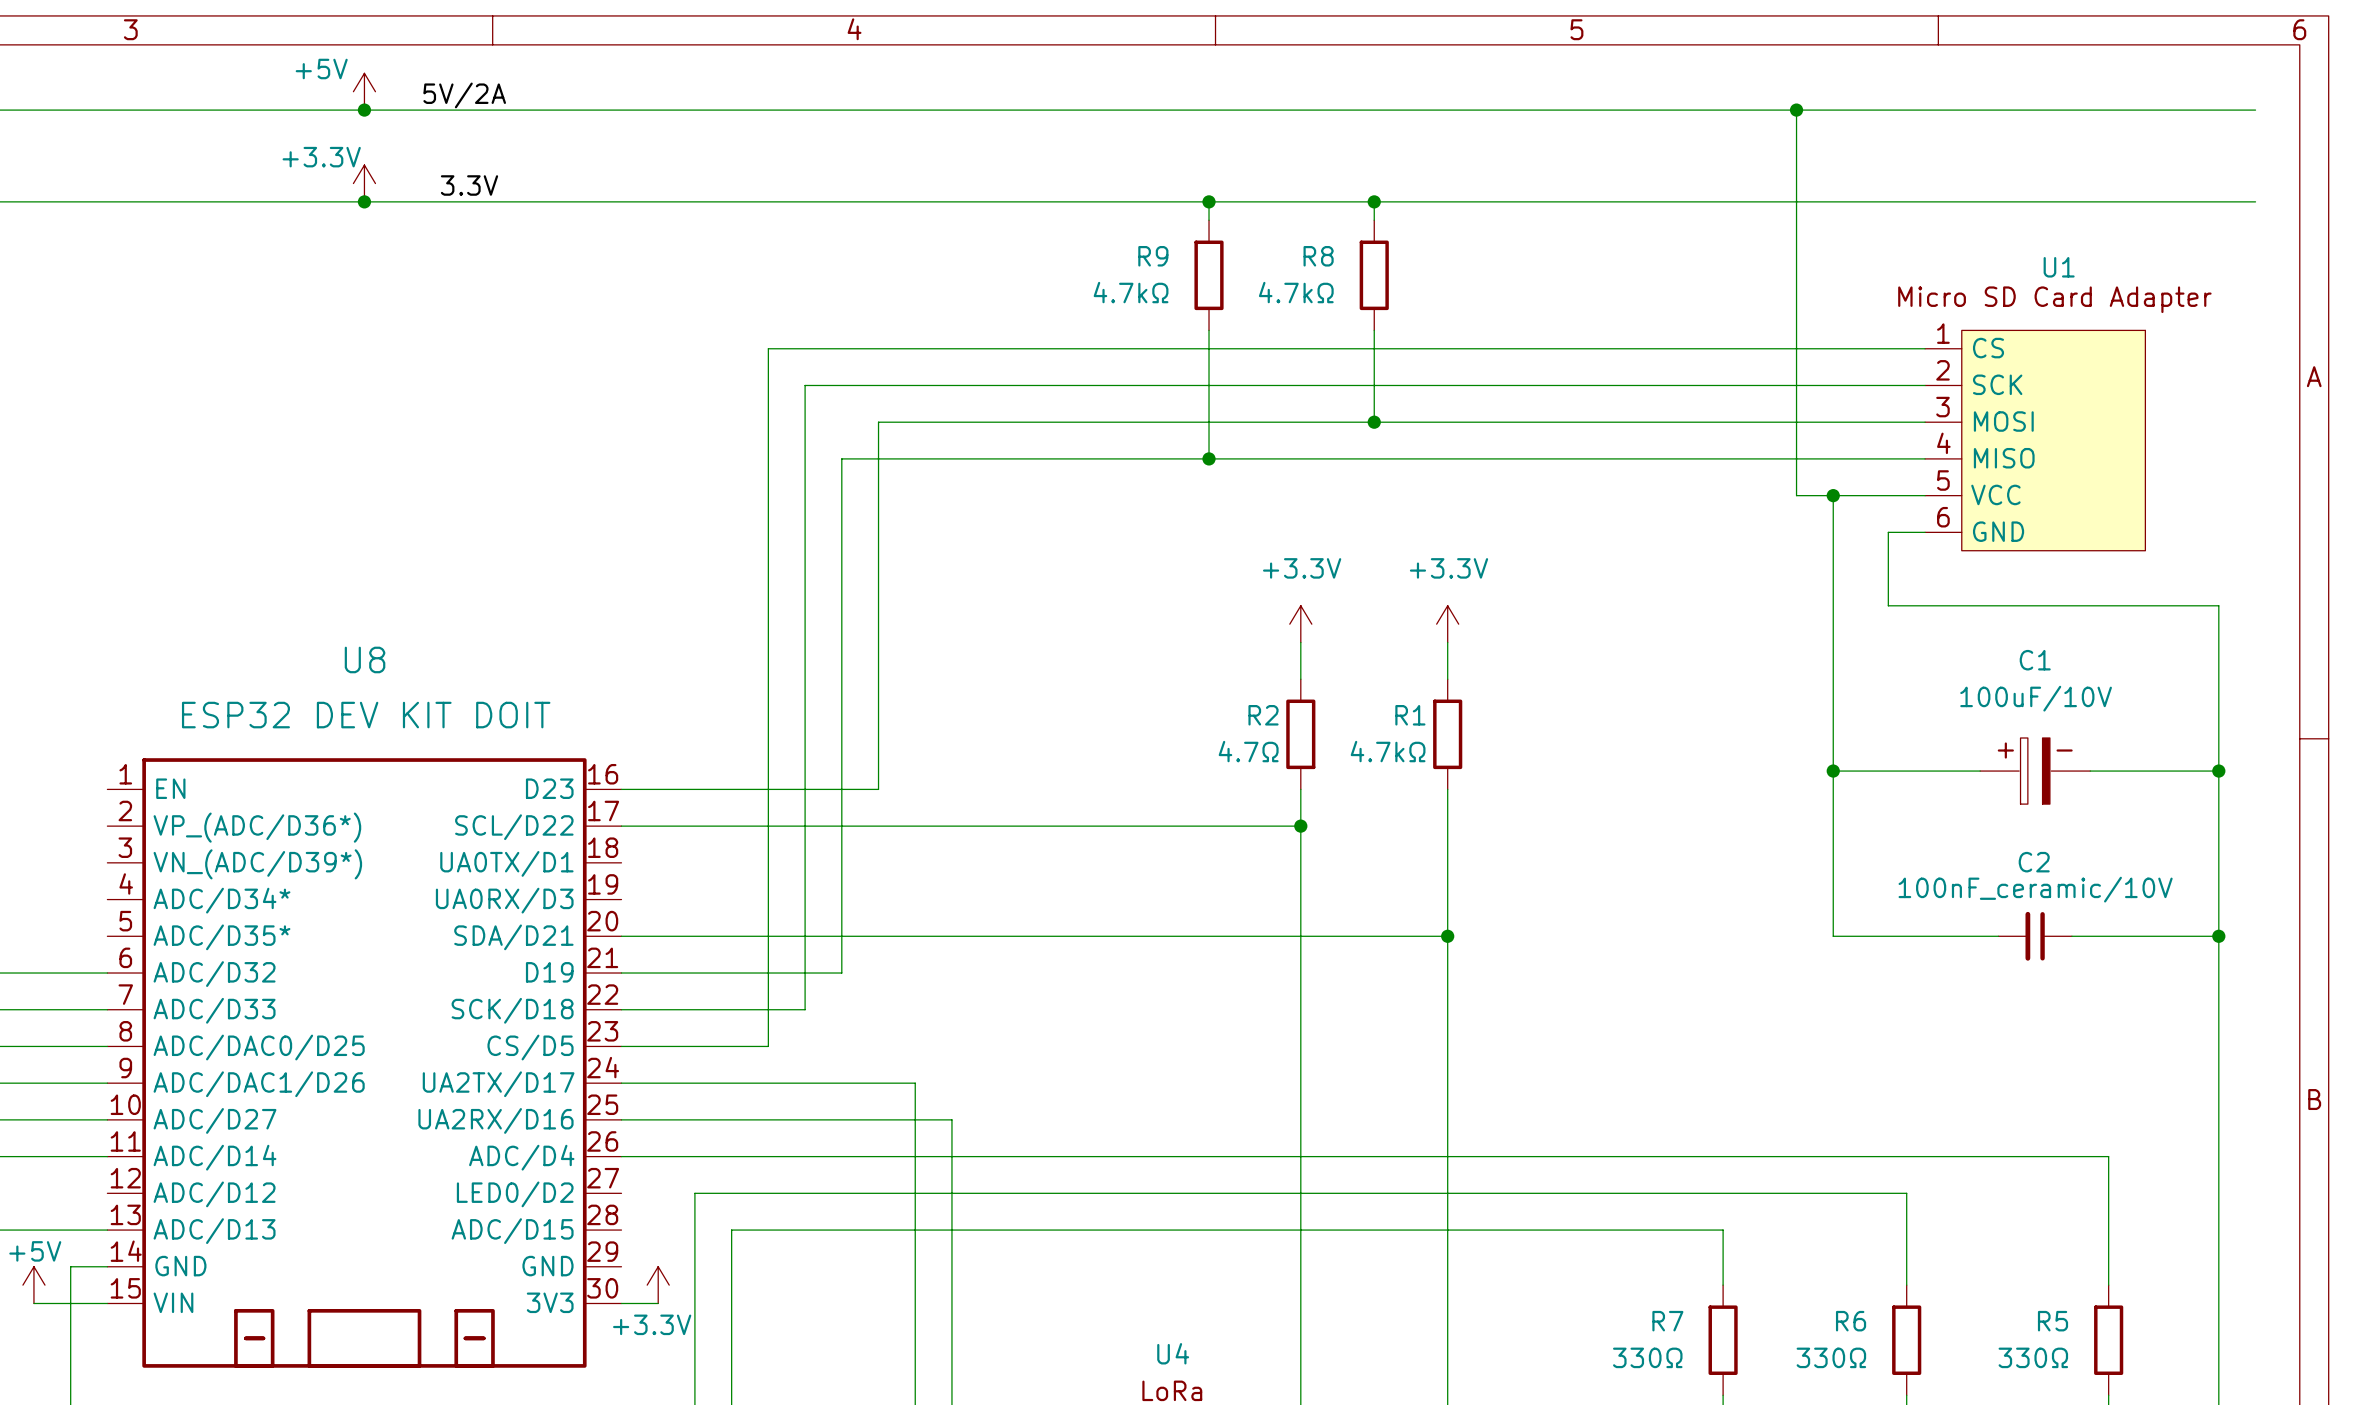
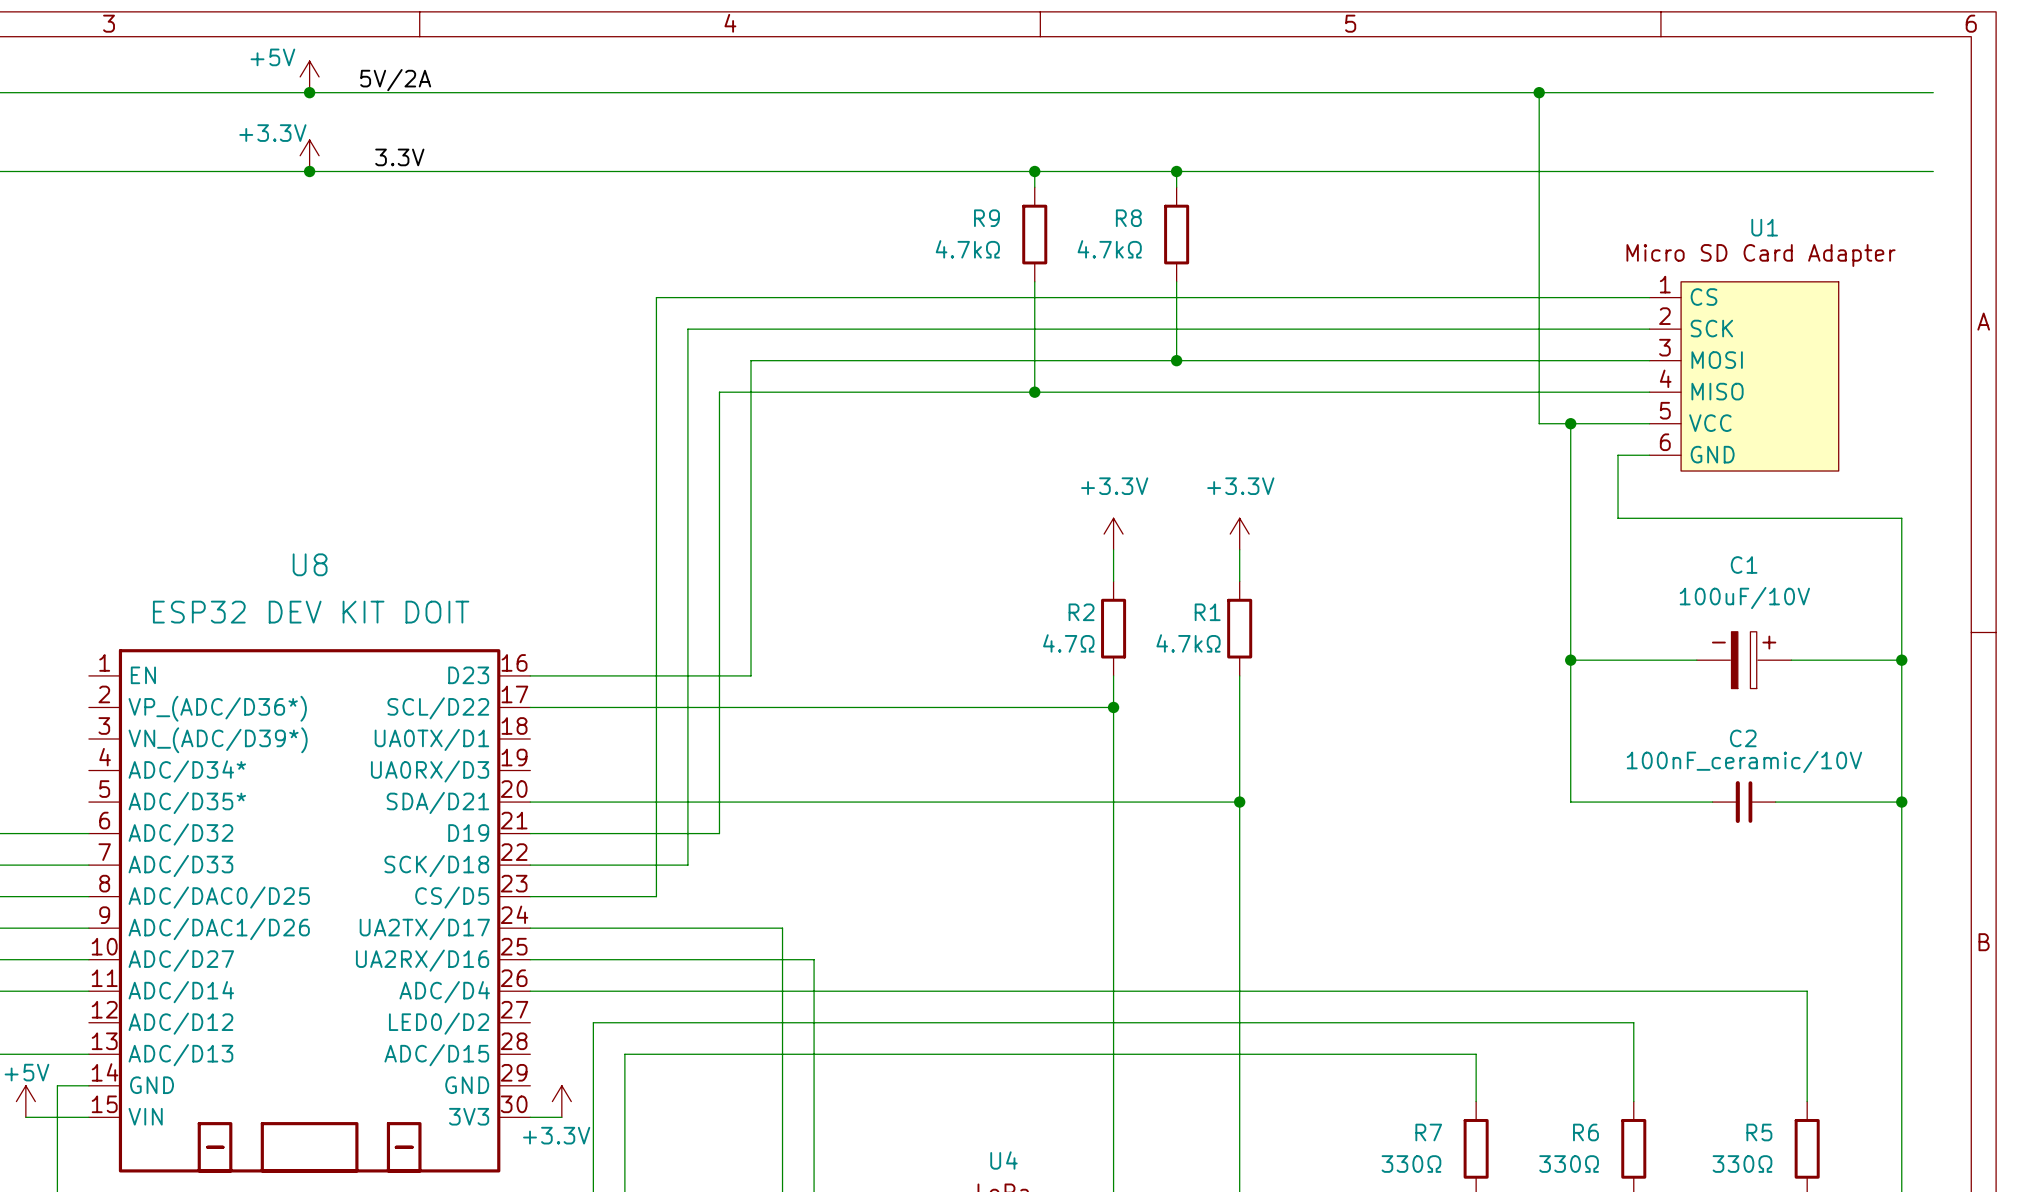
C1 flip: as is (2035, 771) -> left-right (1744, 660)

